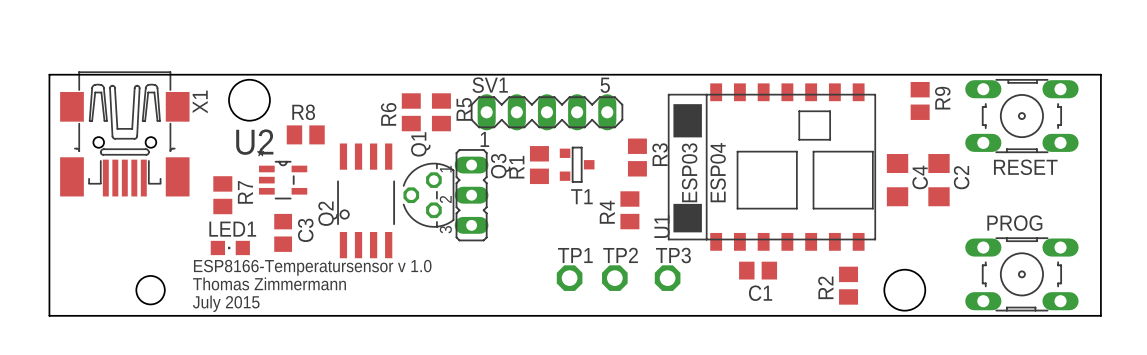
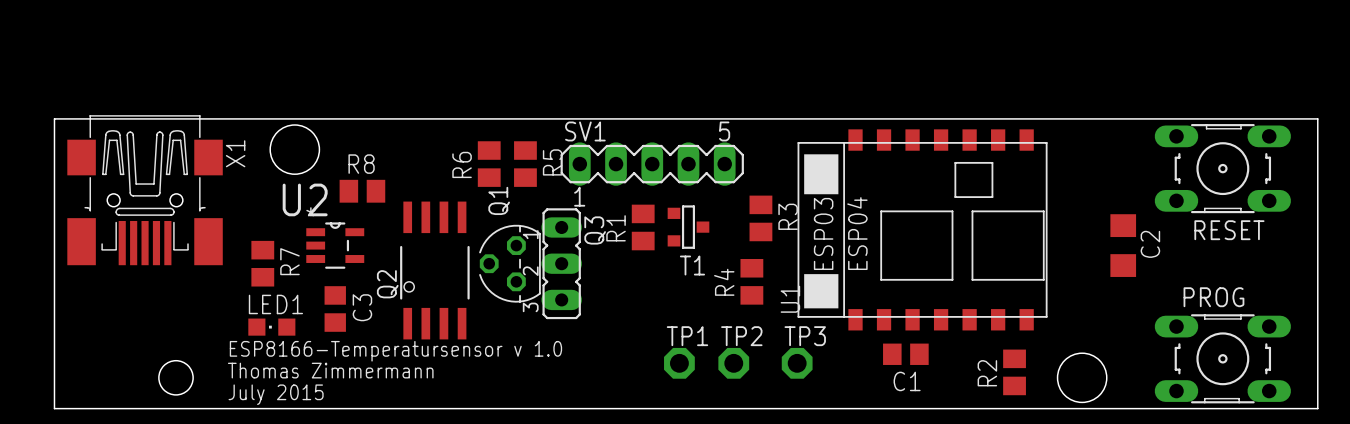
R9: (920, 100) -> none
C4: (897, 180) -> none

